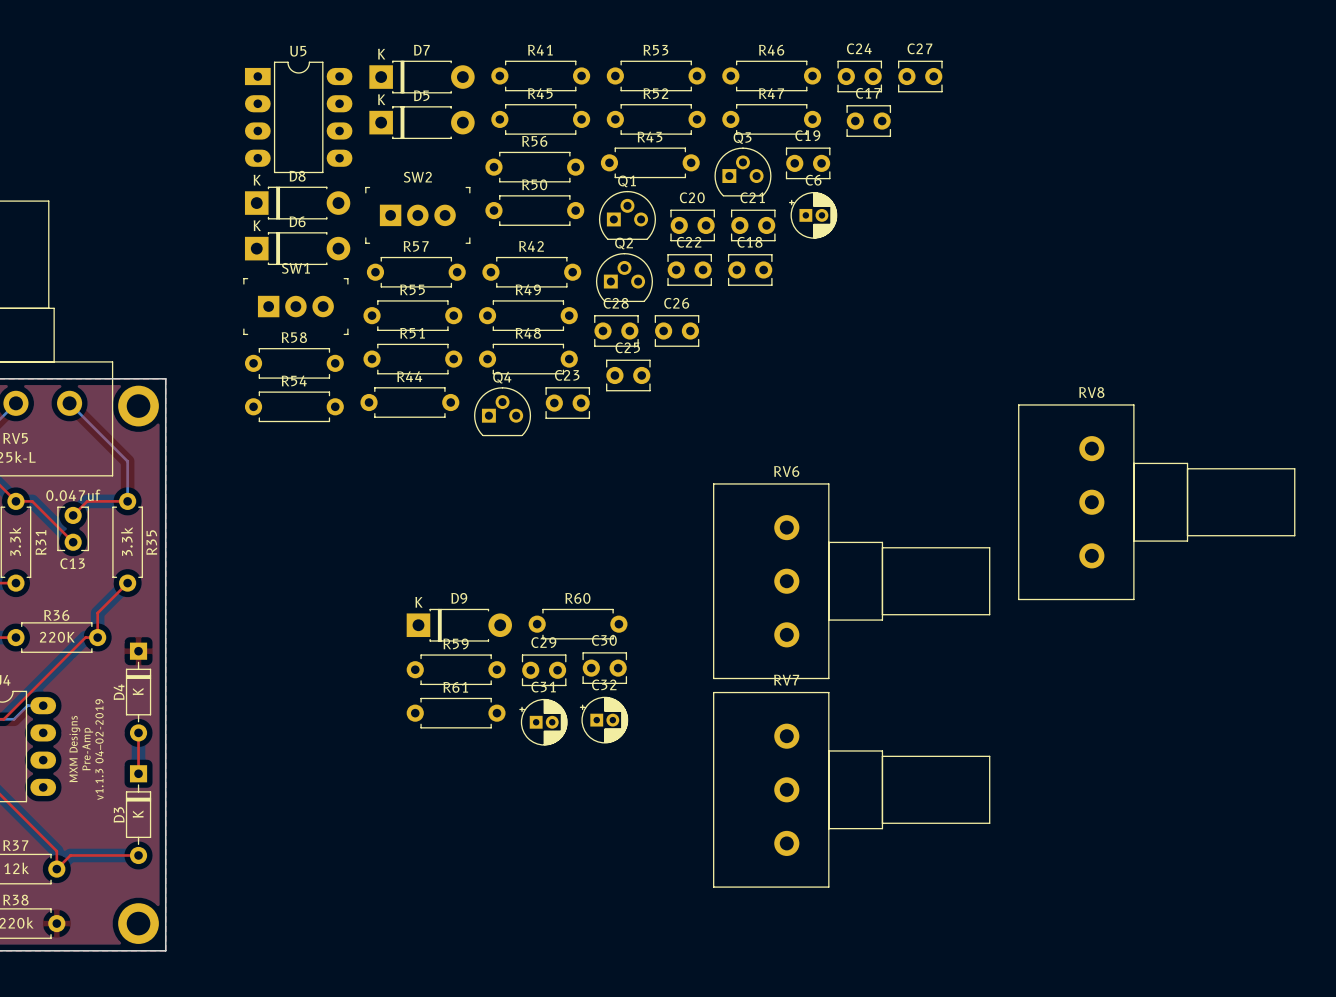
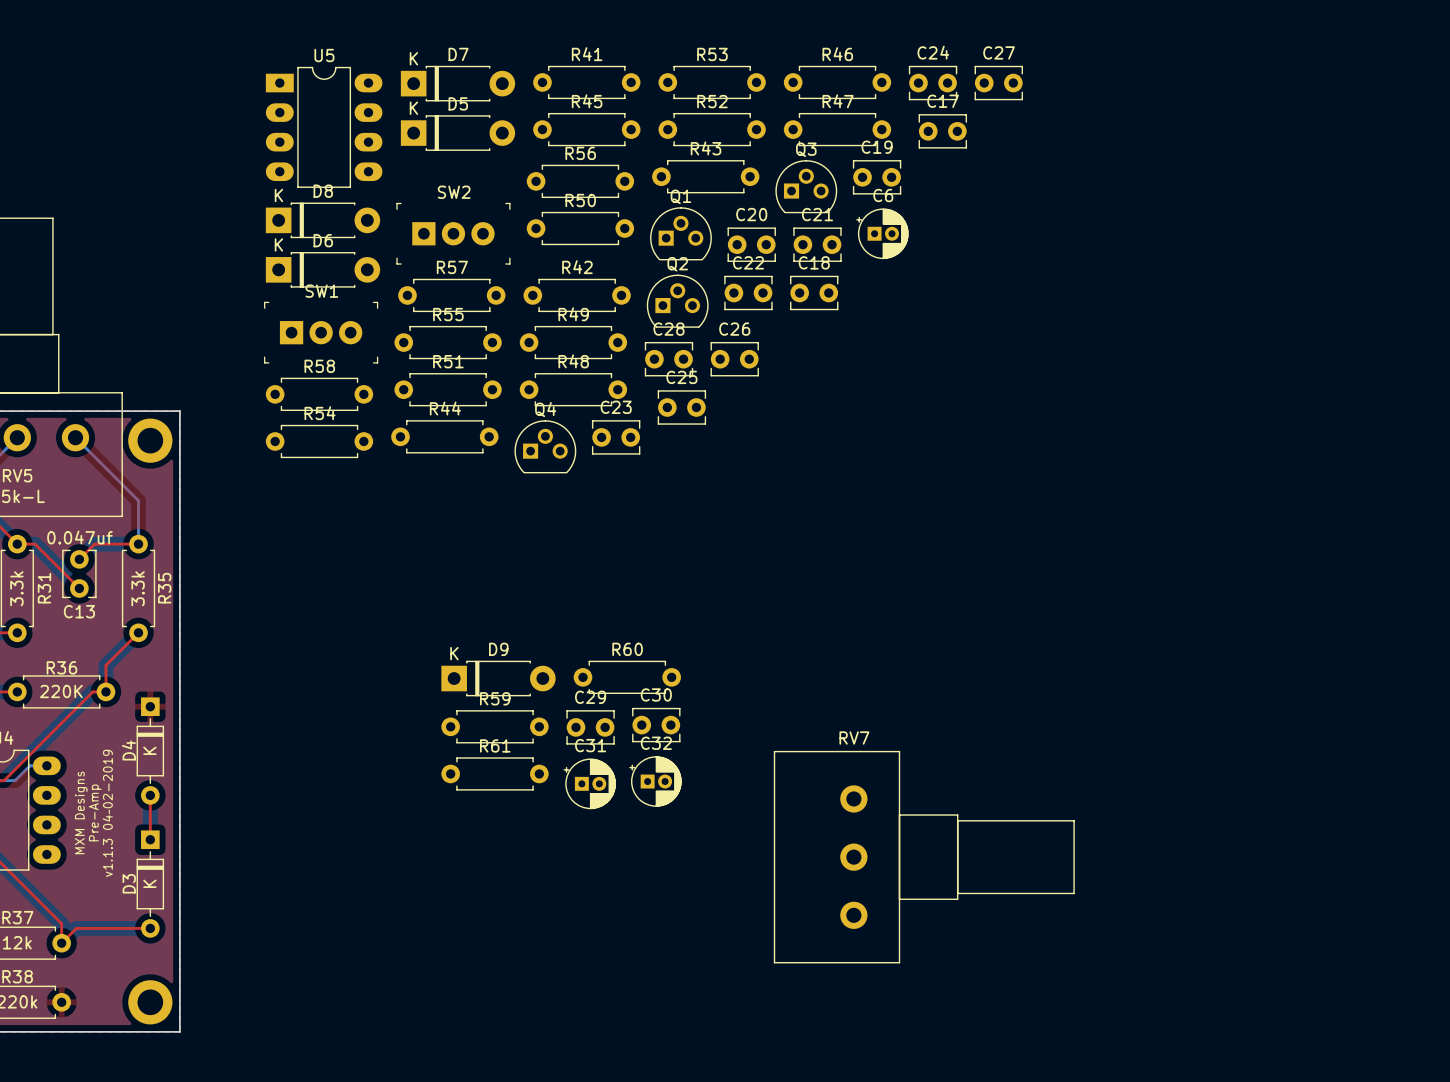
RV8: (1156, 502) -> none
RV6: (851, 581) -> none

